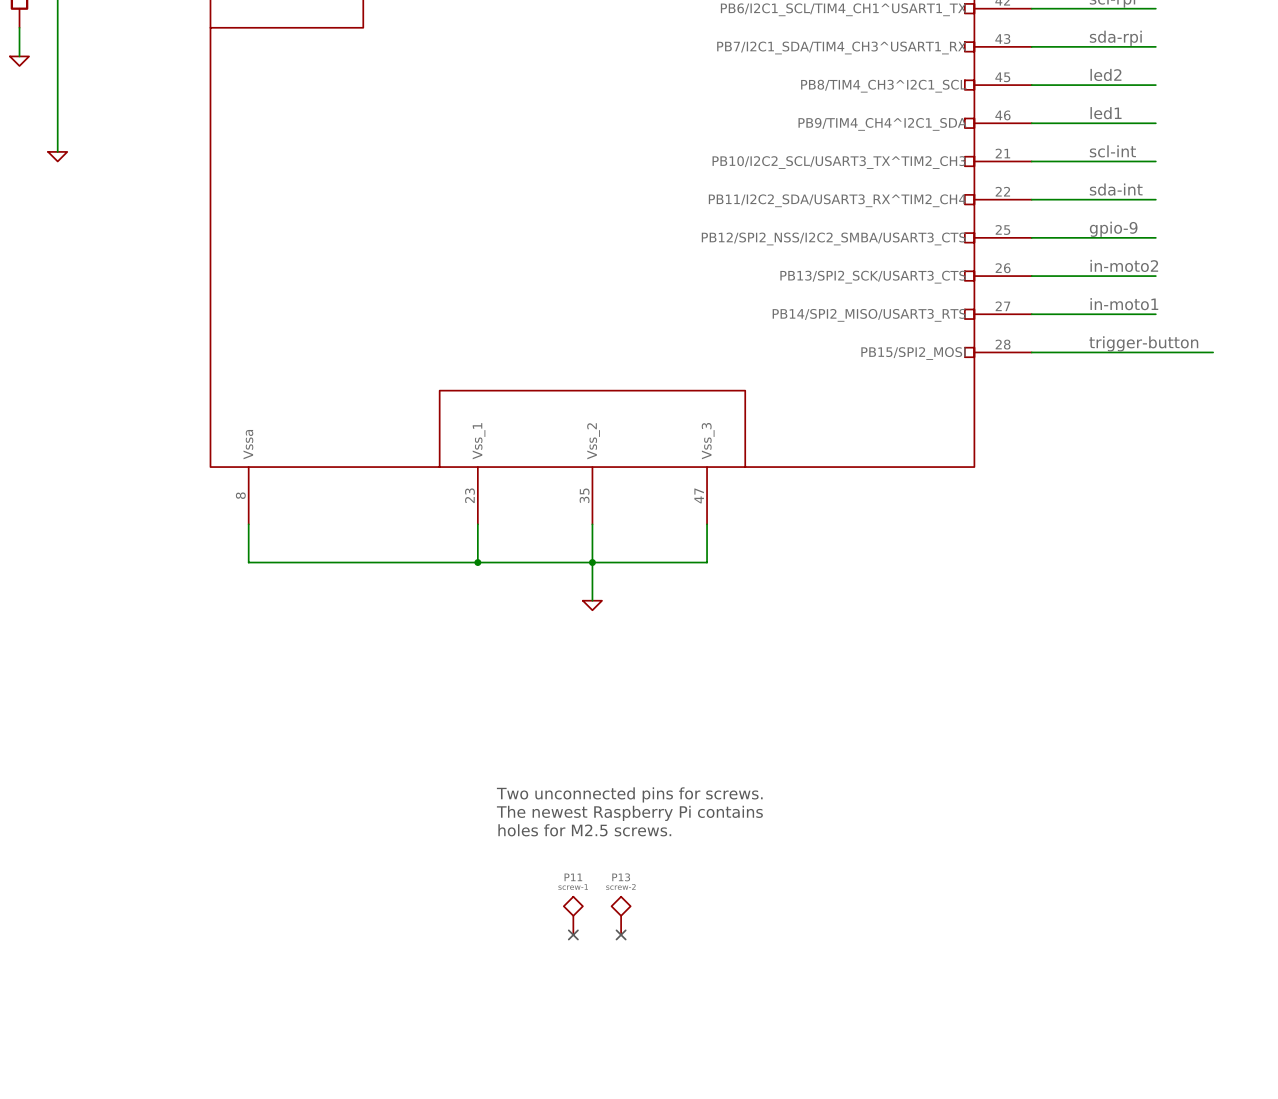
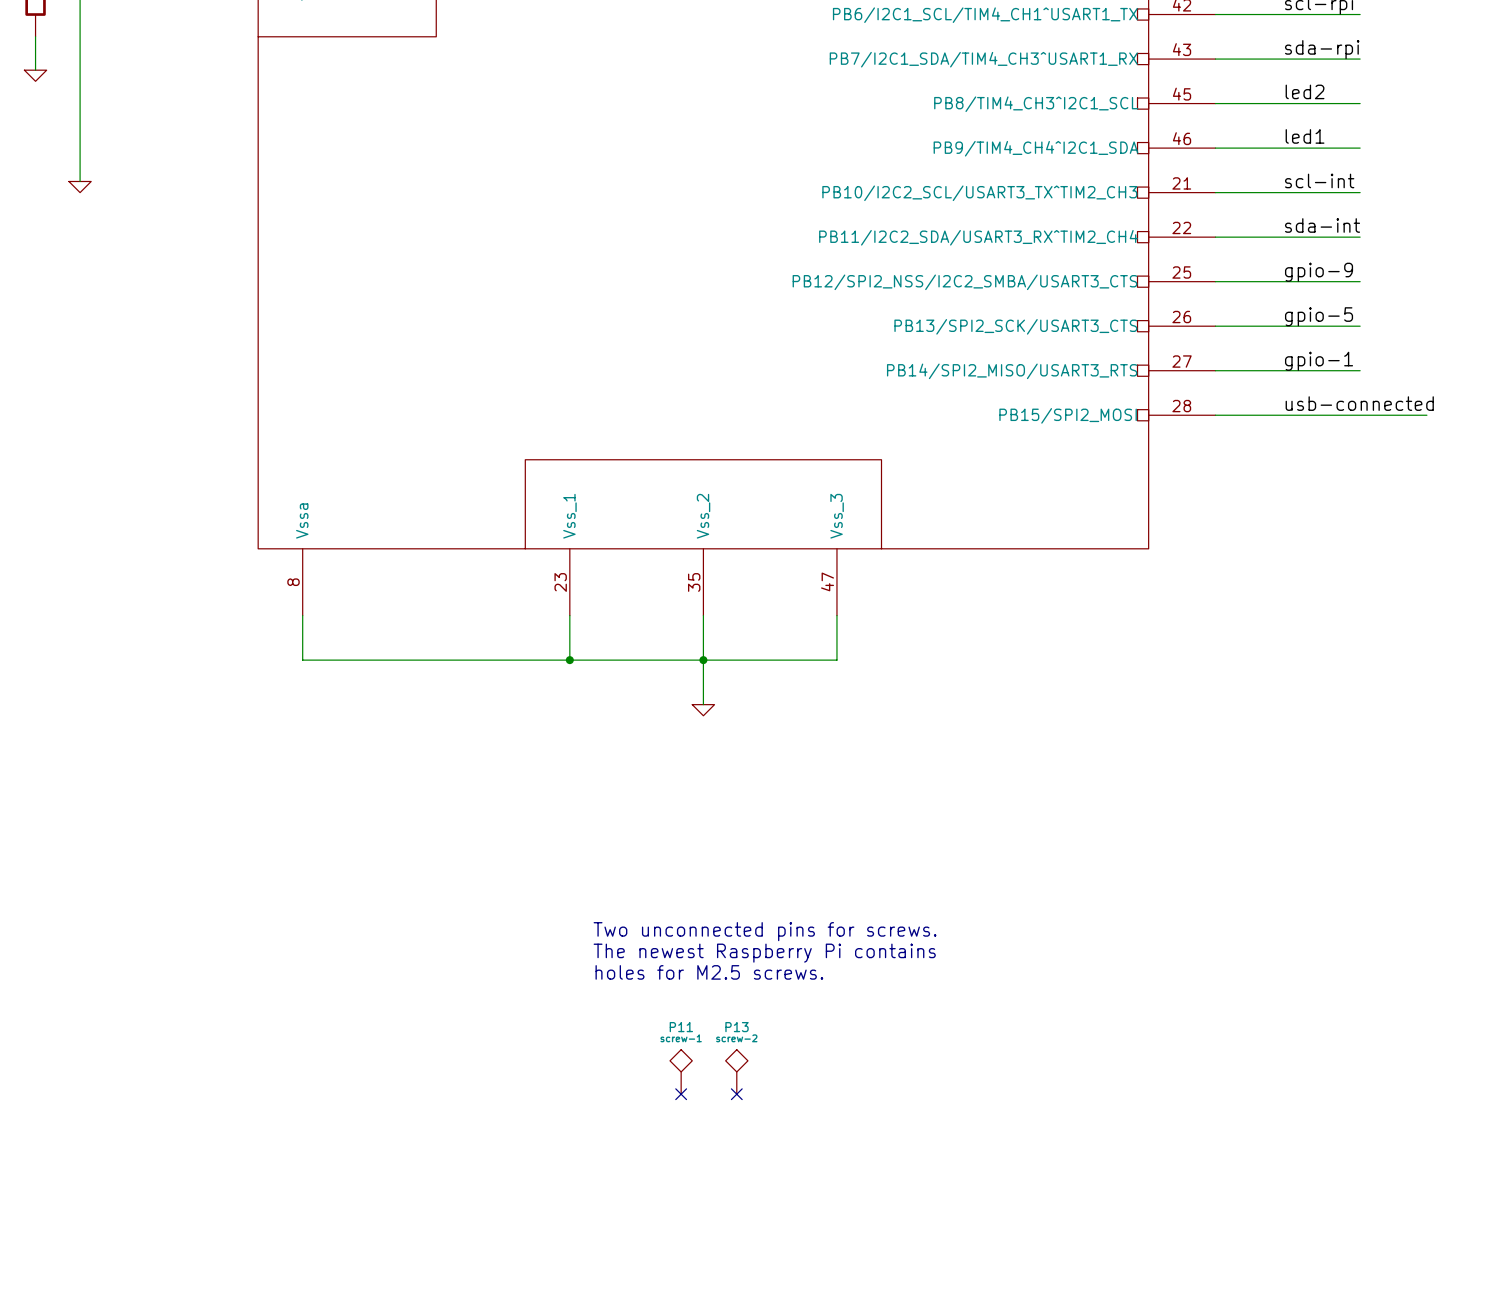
label: in-moto2 (1124, 265) -> gpio-5 (1319, 316)
label: in-moto1 (1124, 304) -> gpio-1 (1319, 361)
label: trigger-button (1143, 343) -> usb-connected (1359, 403)

